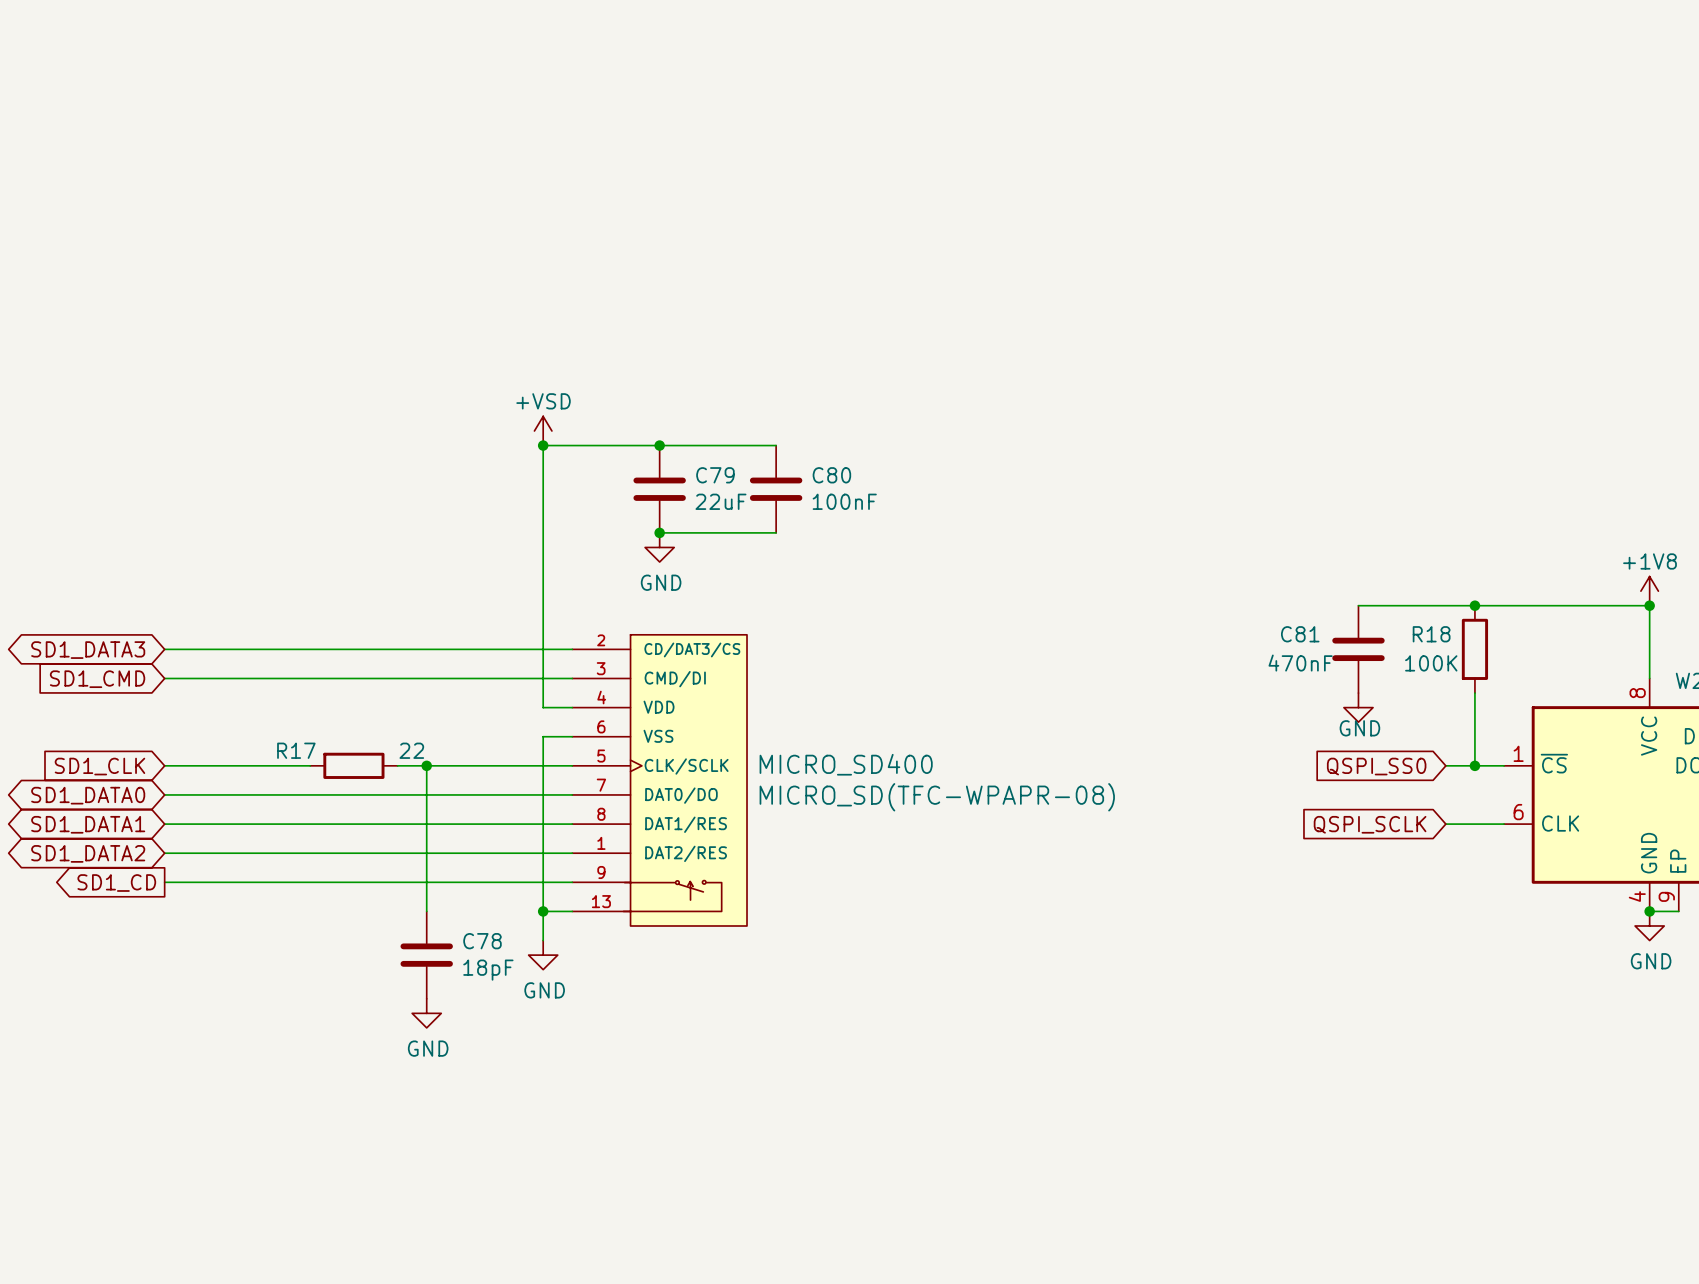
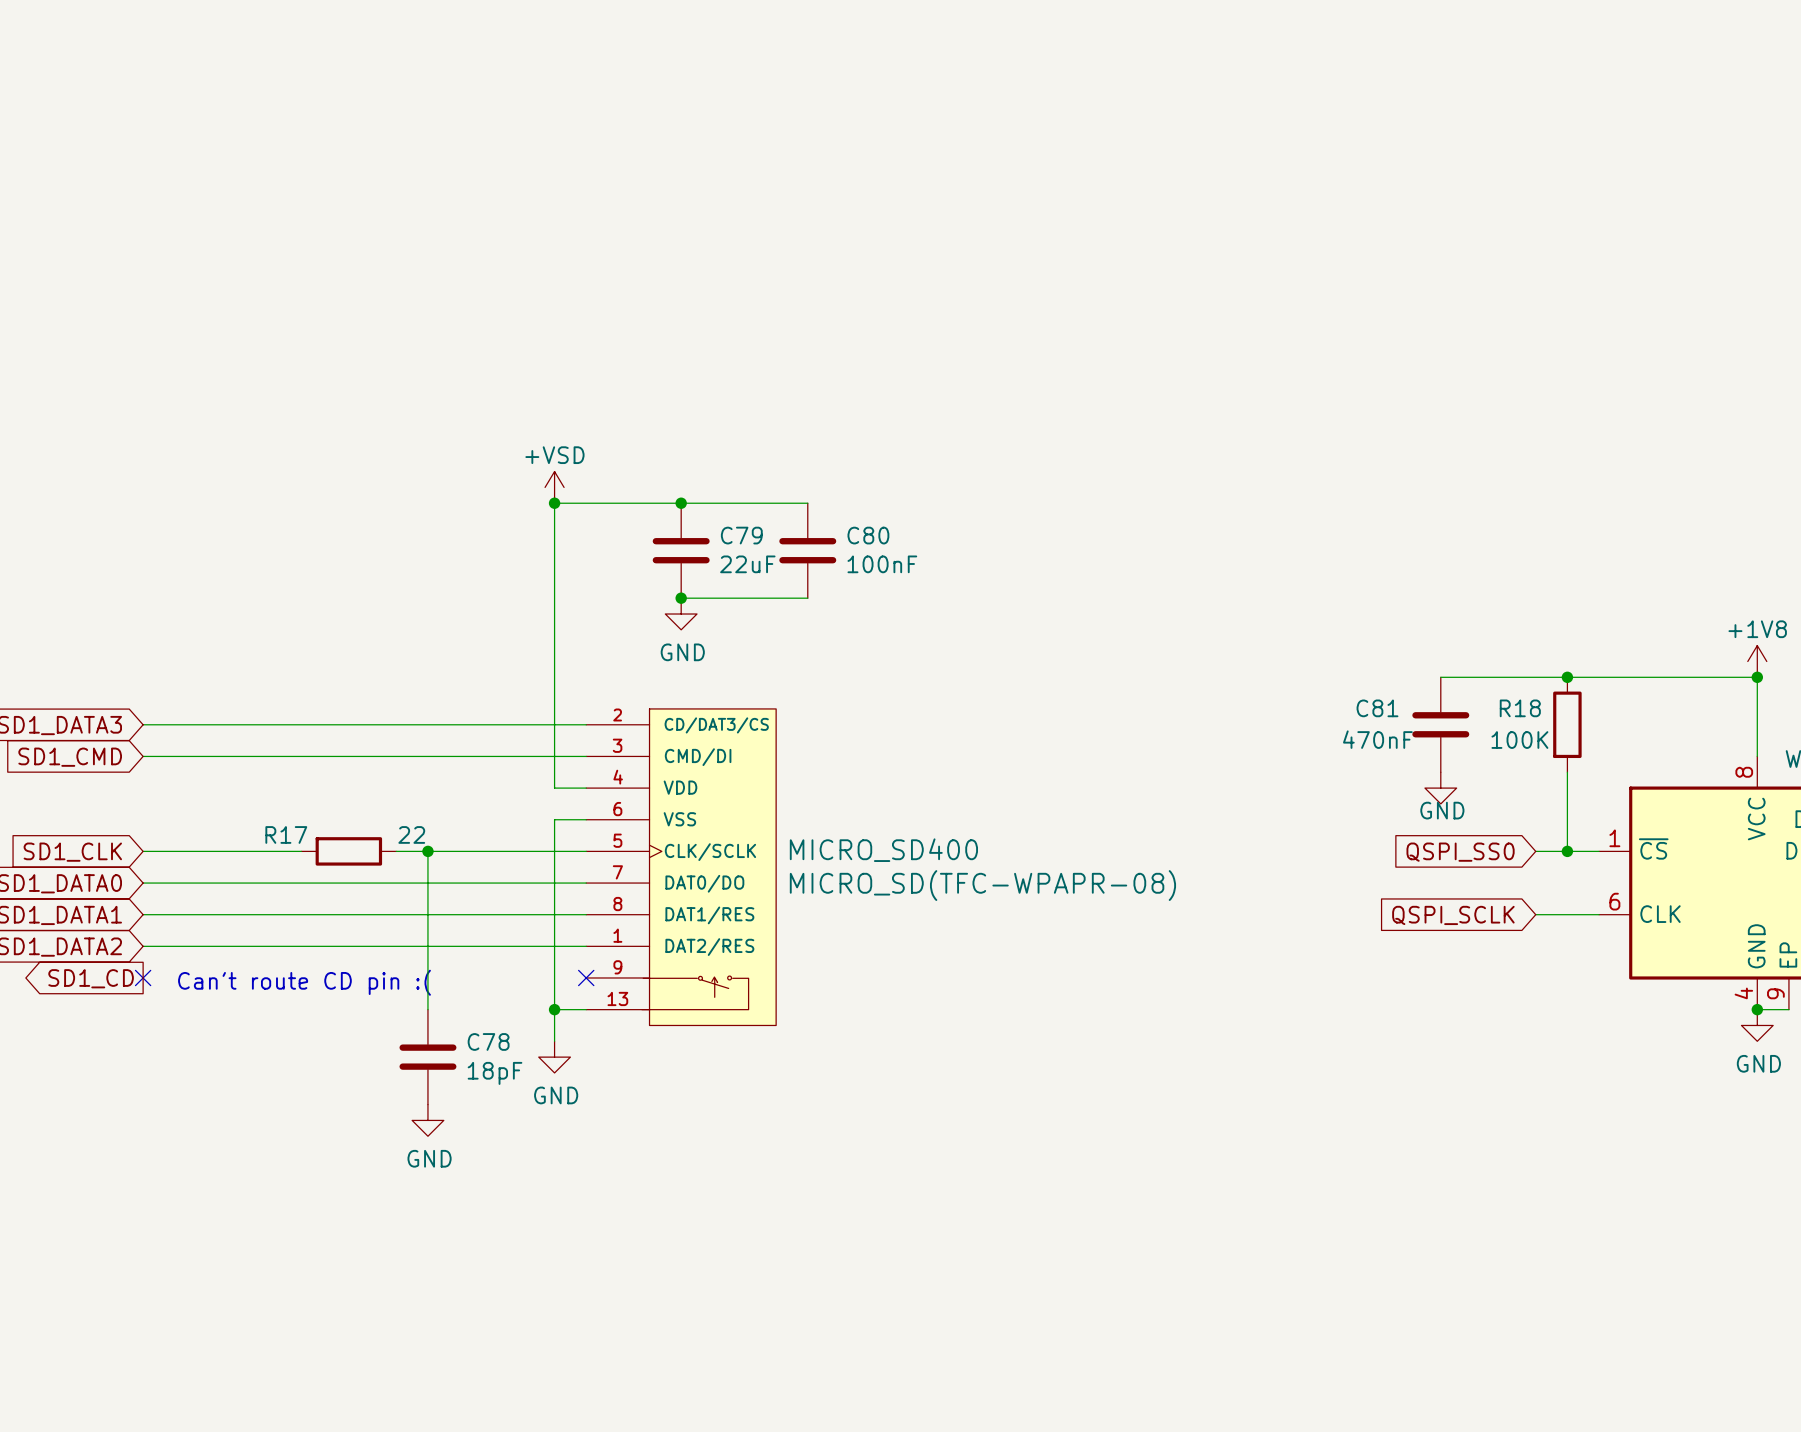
wire: (164, 882) (572, 882) -> none
no-connect mark: none -> (143, 977)
no-connect mark: none -> (586, 977)
text: none -> Can't route CD pin :( (304, 982)

